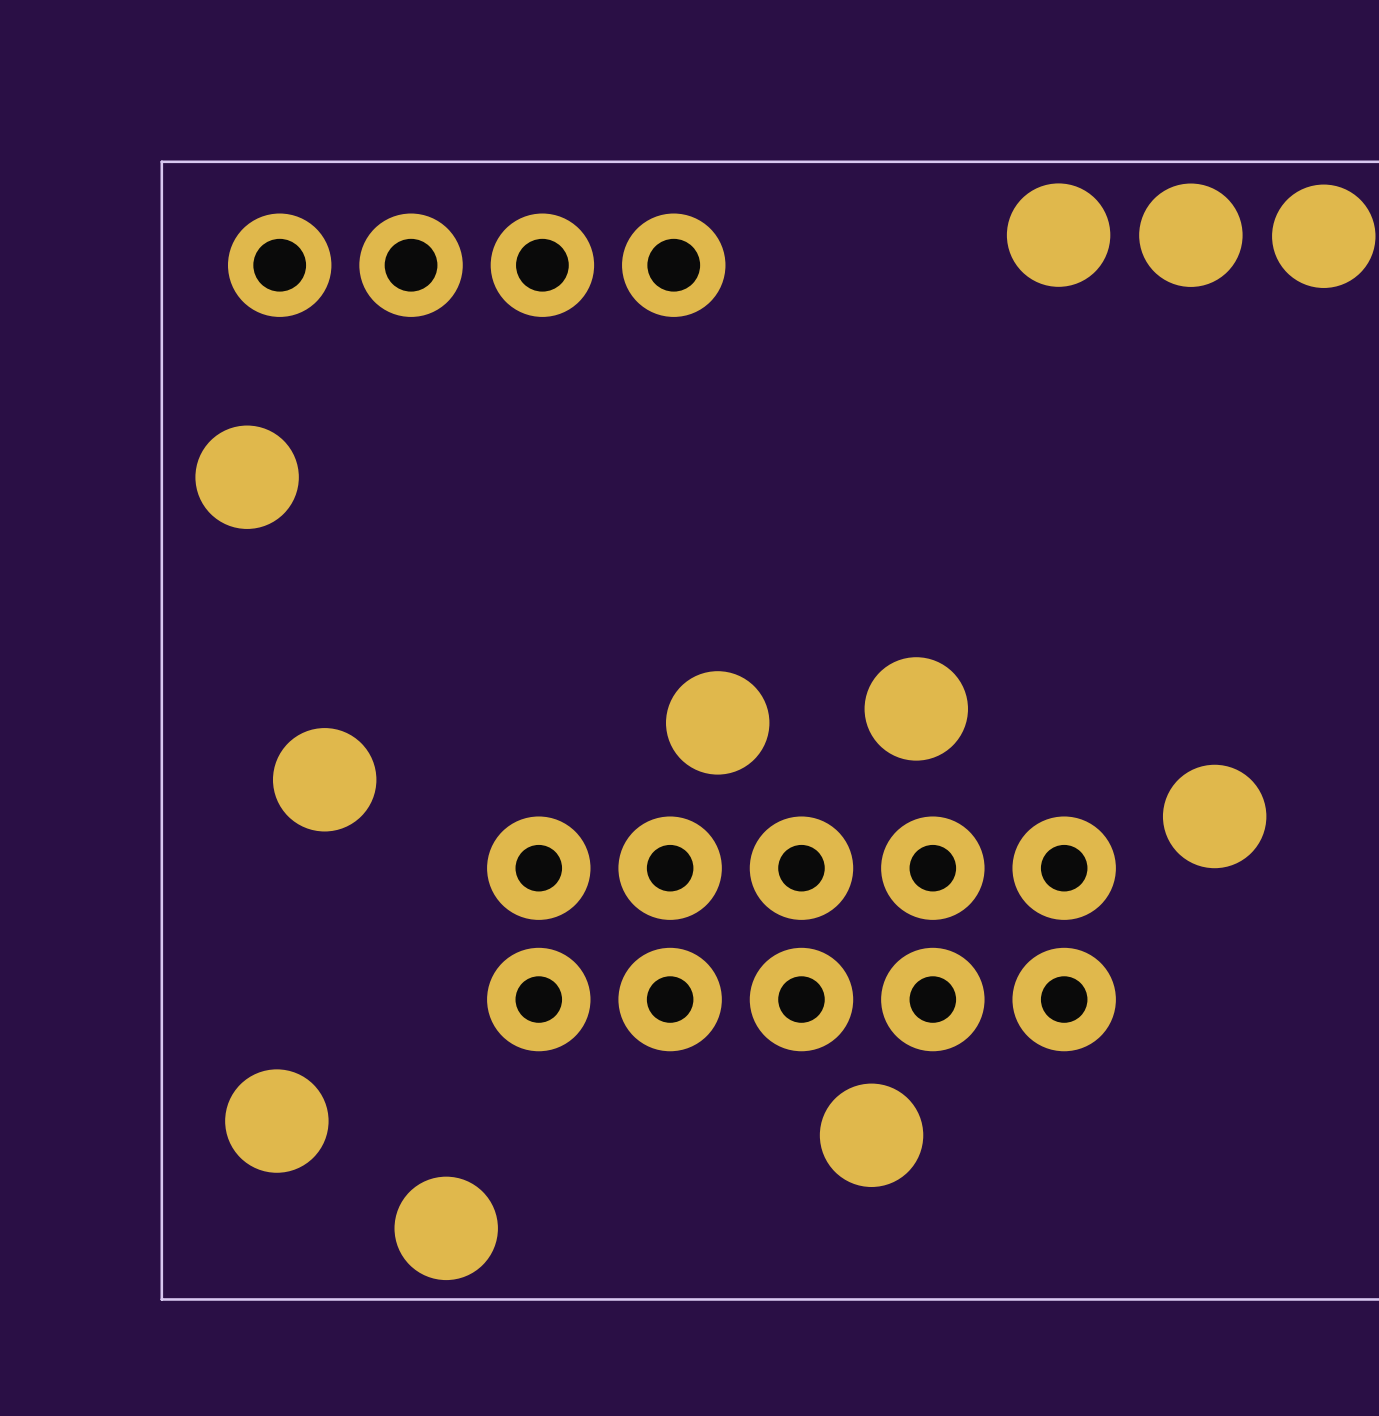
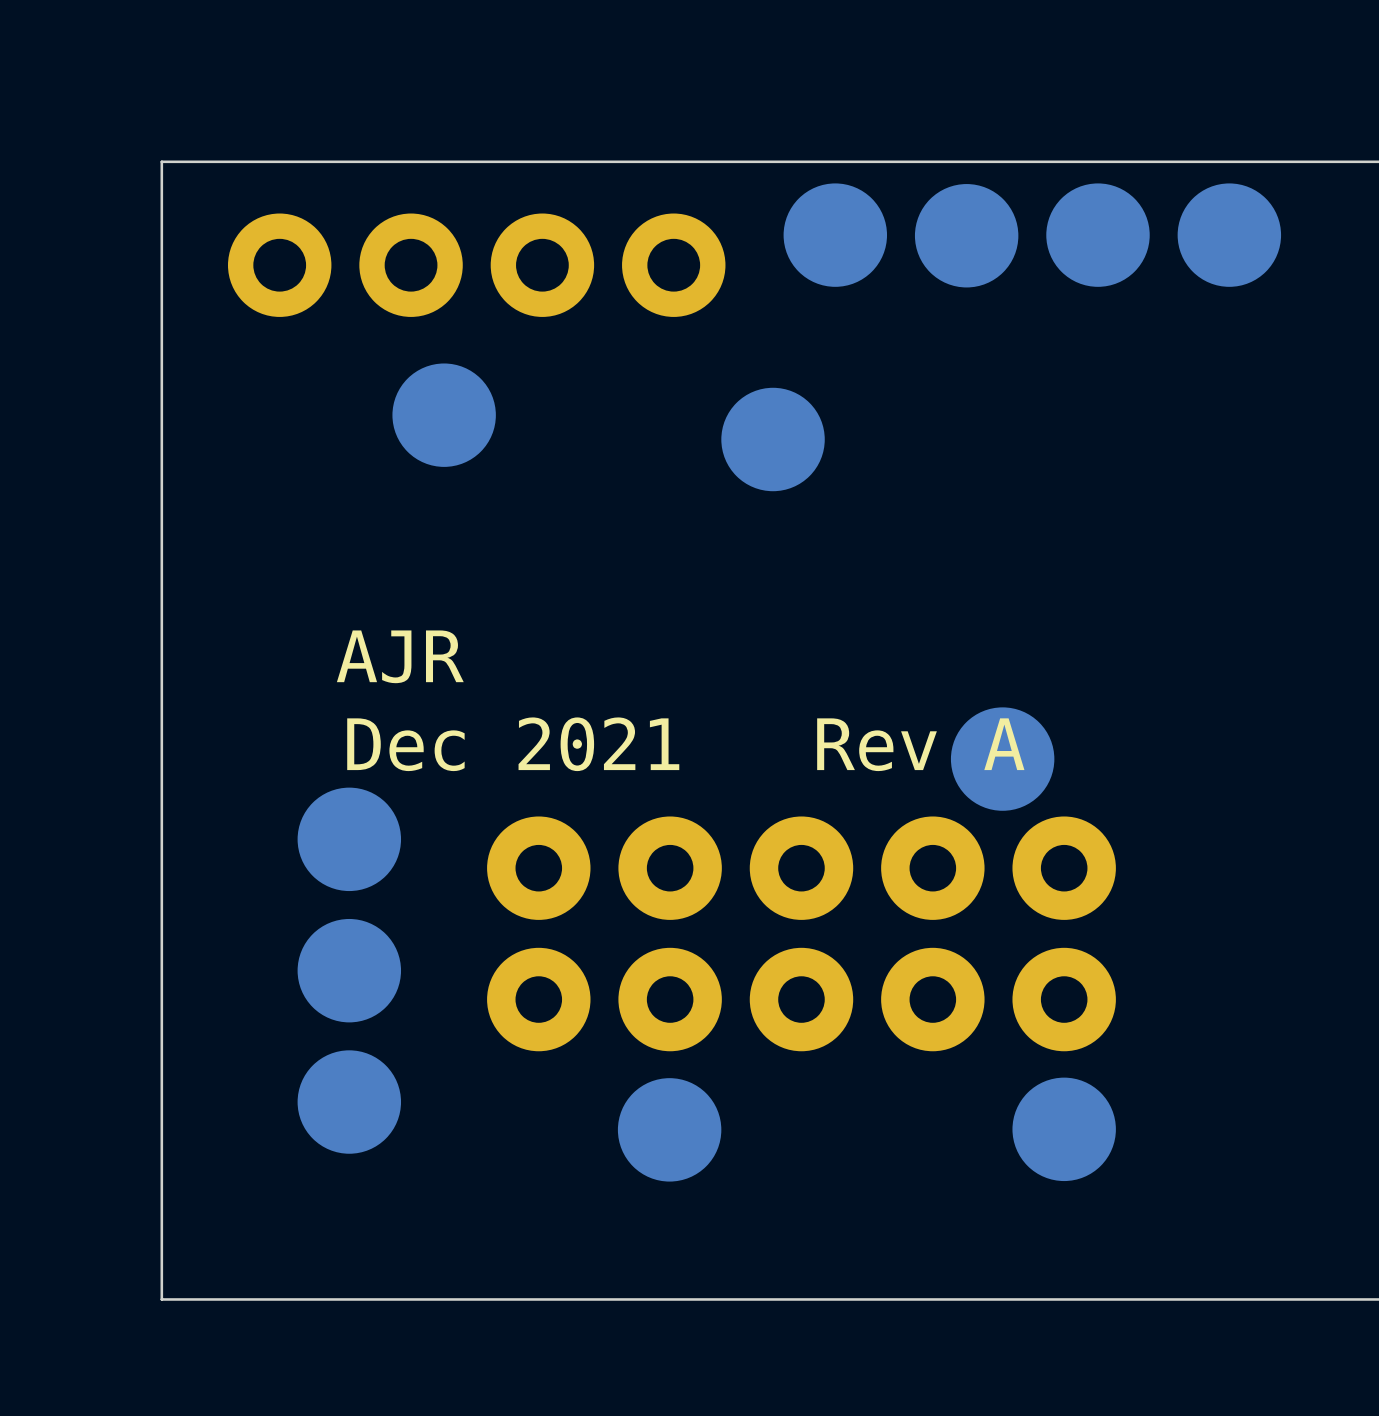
part: none -> (835, 235)
part: none -> (966, 235)
part position: (1058, 235) -> (1098, 235)
part position: (1190, 235) -> (1229, 235)
part: (1323, 236) -> none
part: none -> (444, 415)
part: none -> (773, 439)
part: (247, 477) -> none
text: none -> AJR (400, 656)
part position: (916, 708) -> (1002, 759)
part: (717, 722) -> none
text: none -> Dec 2021 Rev A (685, 744)
part position: (324, 779) -> (349, 839)
part: (1214, 816) -> none
part: none -> (349, 970)
part position: (276, 1121) -> (349, 1102)
part: none -> (669, 1129)
part: none -> (1064, 1129)
part: (871, 1135) -> none
part: (446, 1228) -> none

